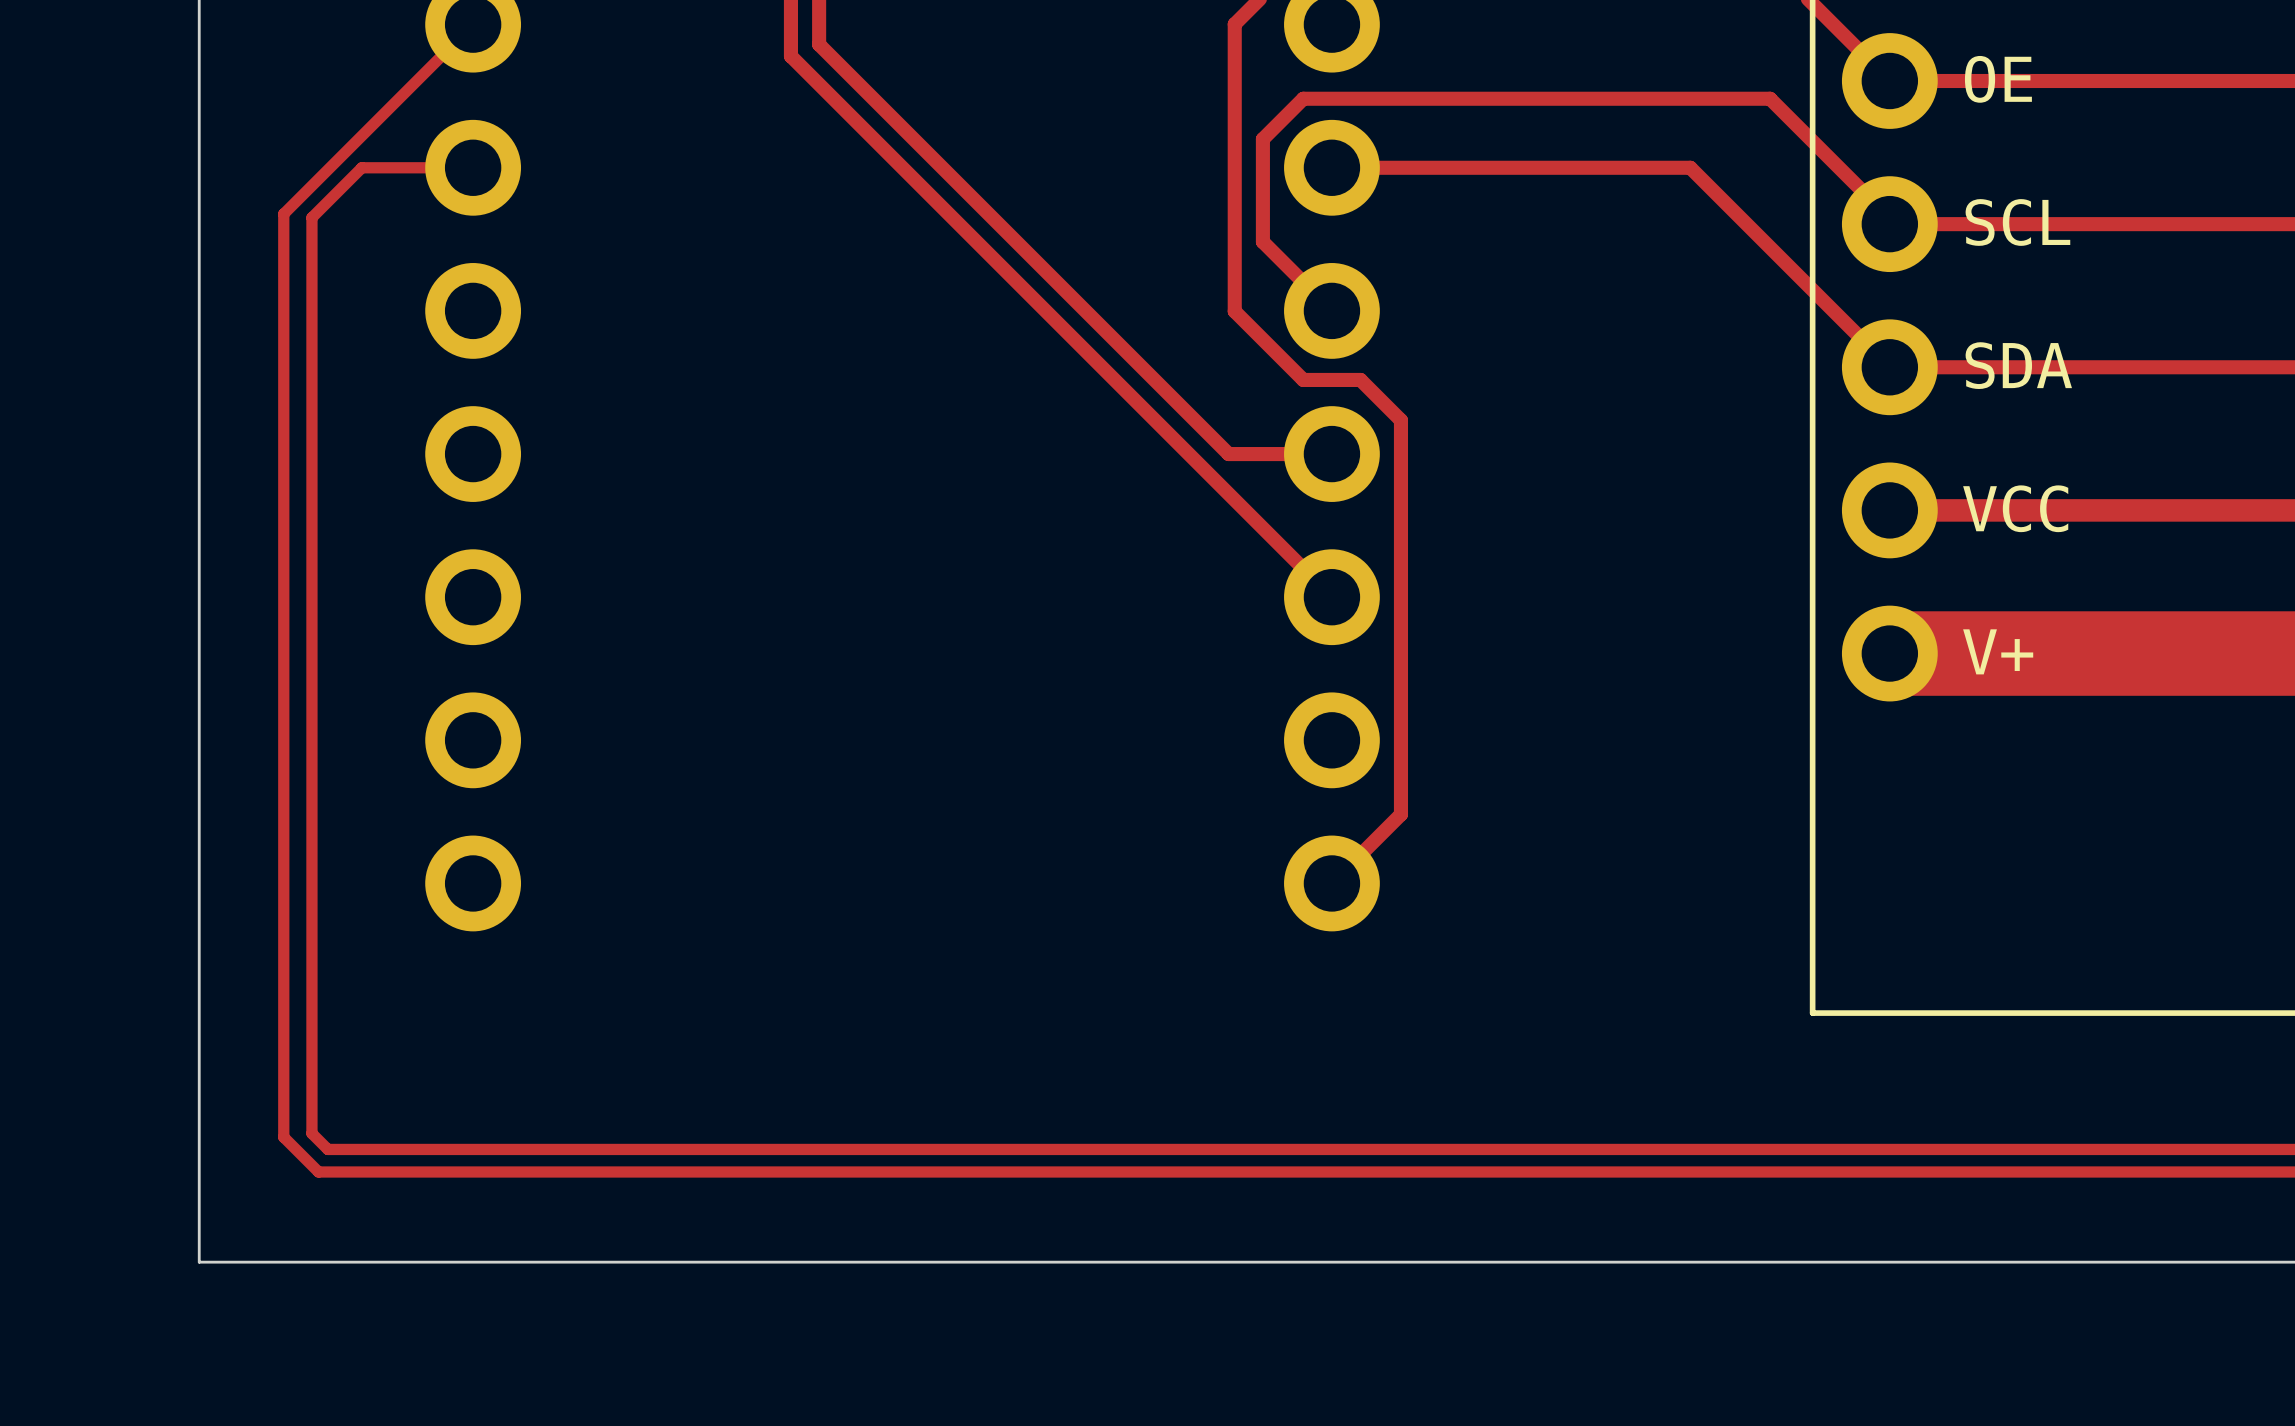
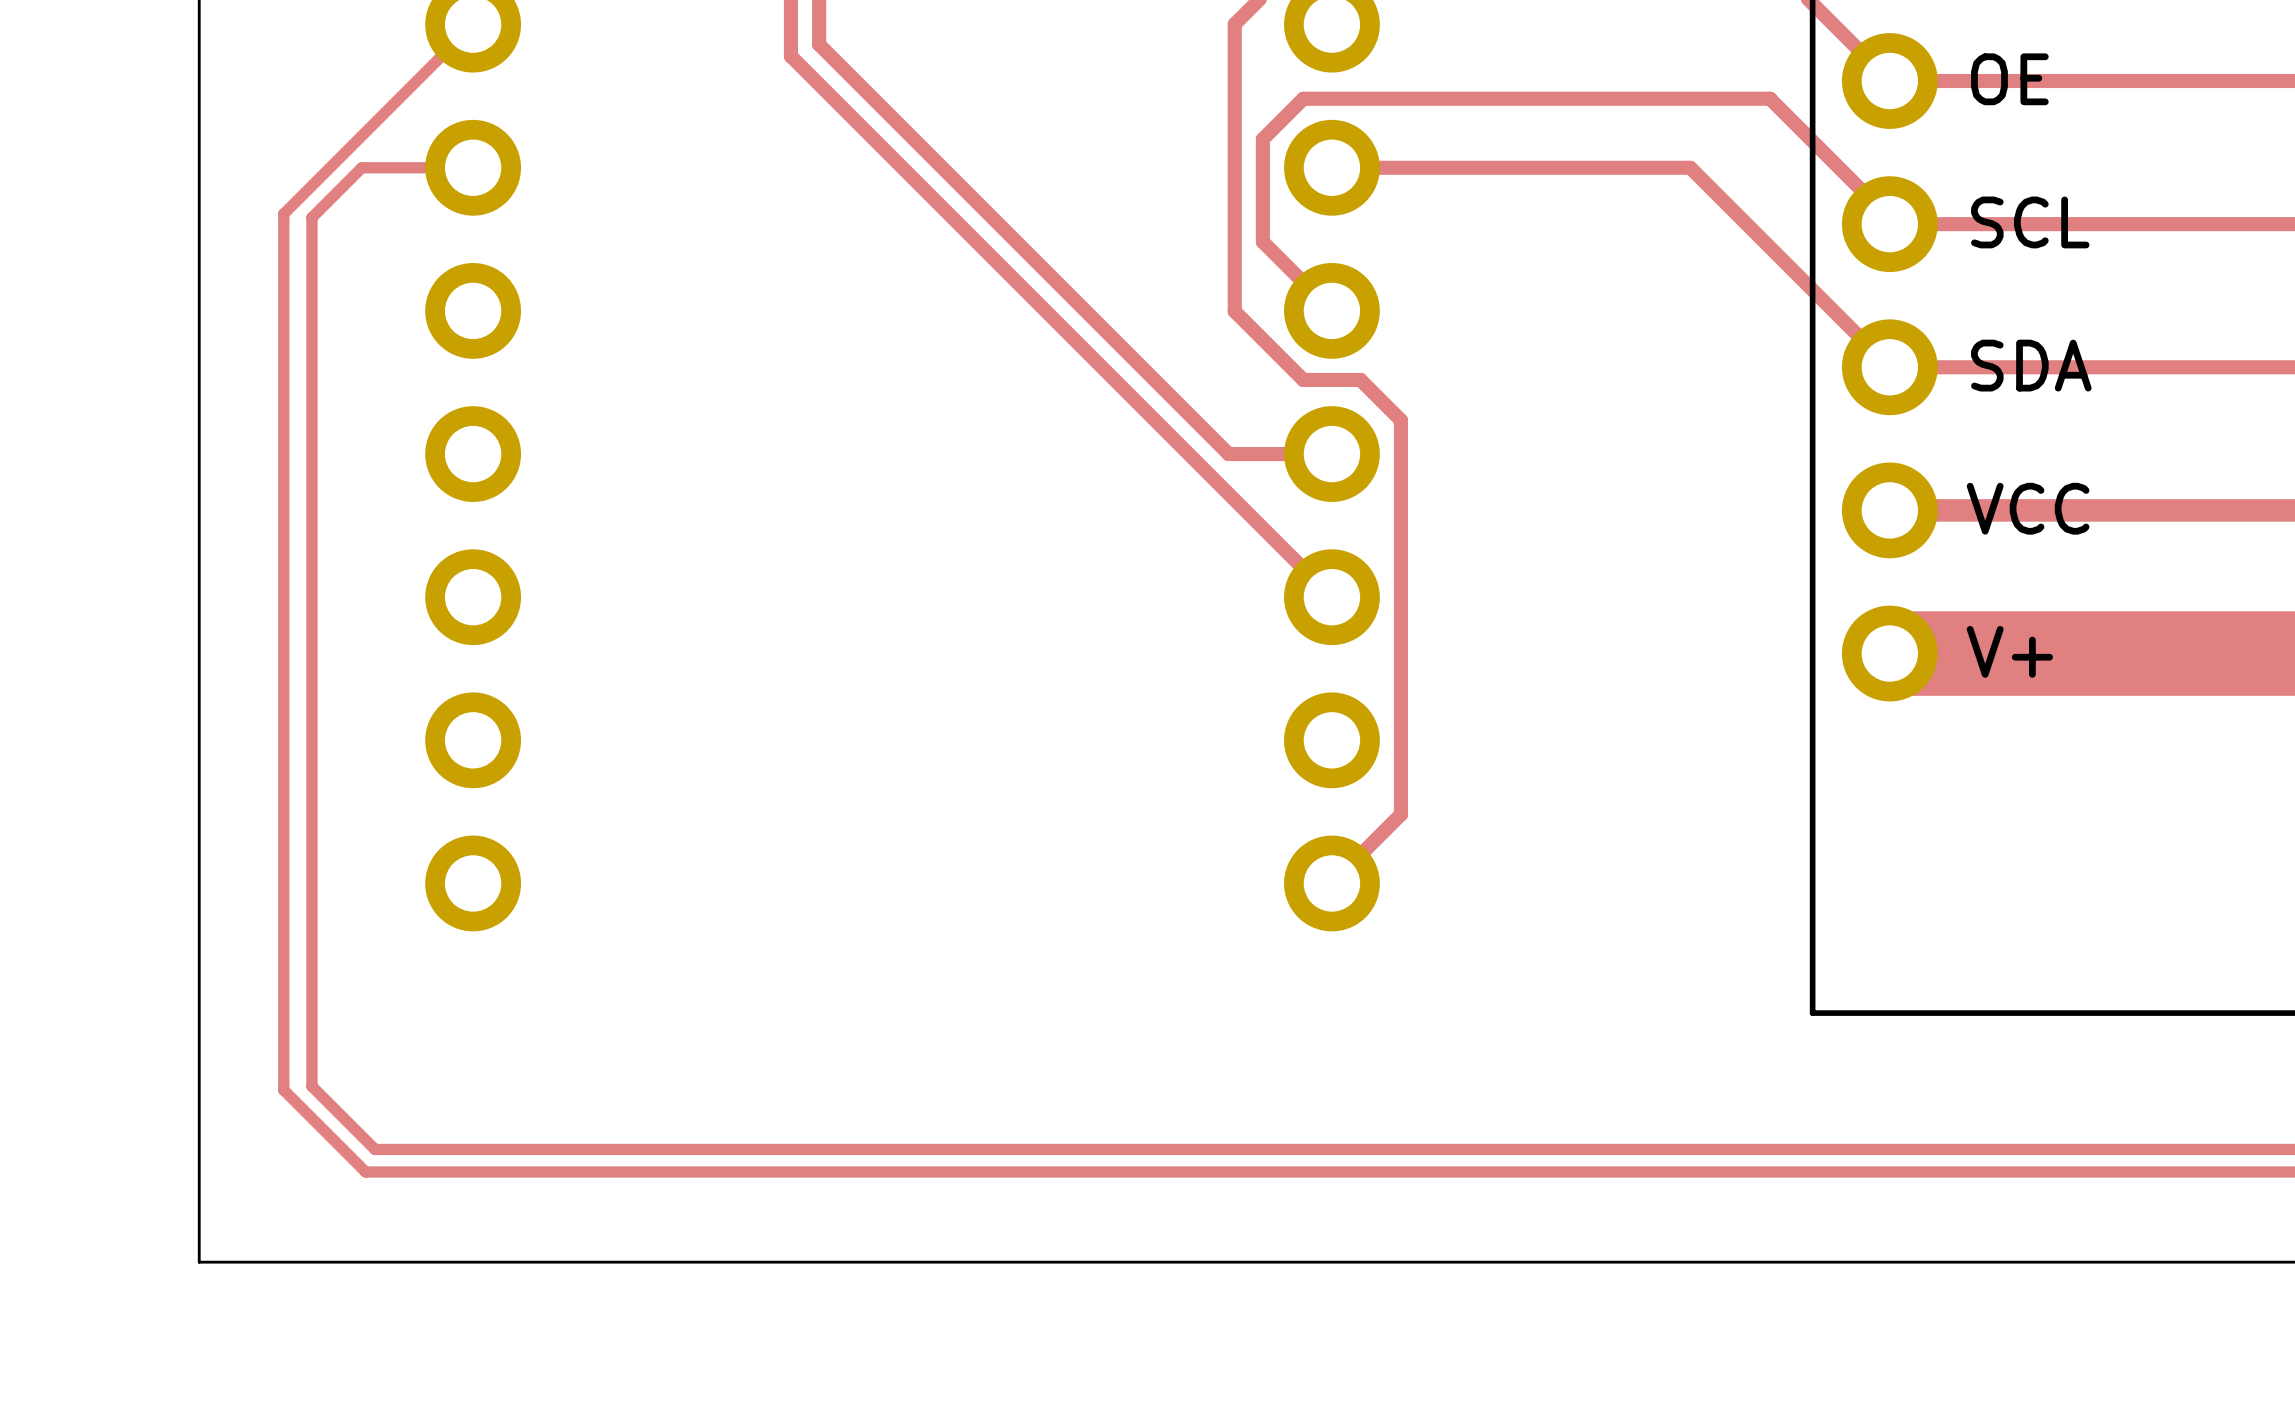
track: (311, 1086) (311, 1133) (327, 1149) (375, 1149) -> (311, 1086) (375, 1149)
track: (283, 1090) (283, 1137) (318, 1171) (365, 1171) -> (283, 1090) (365, 1171)

